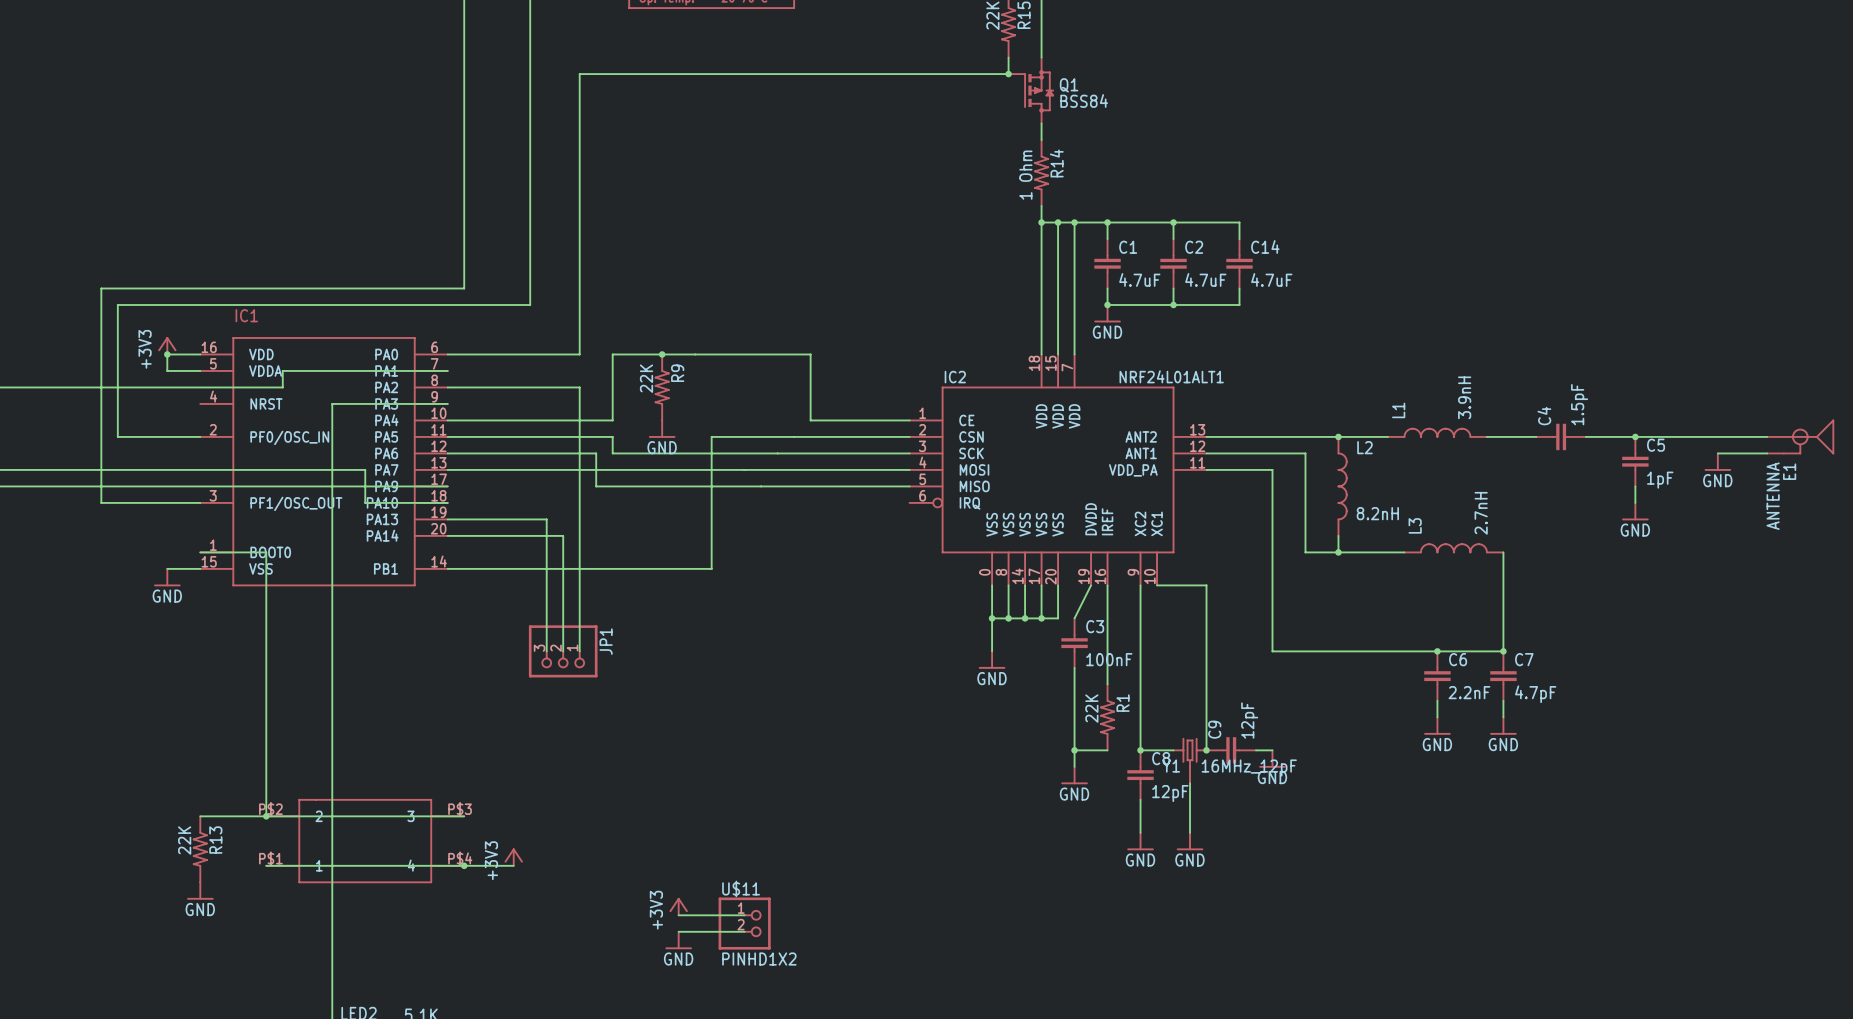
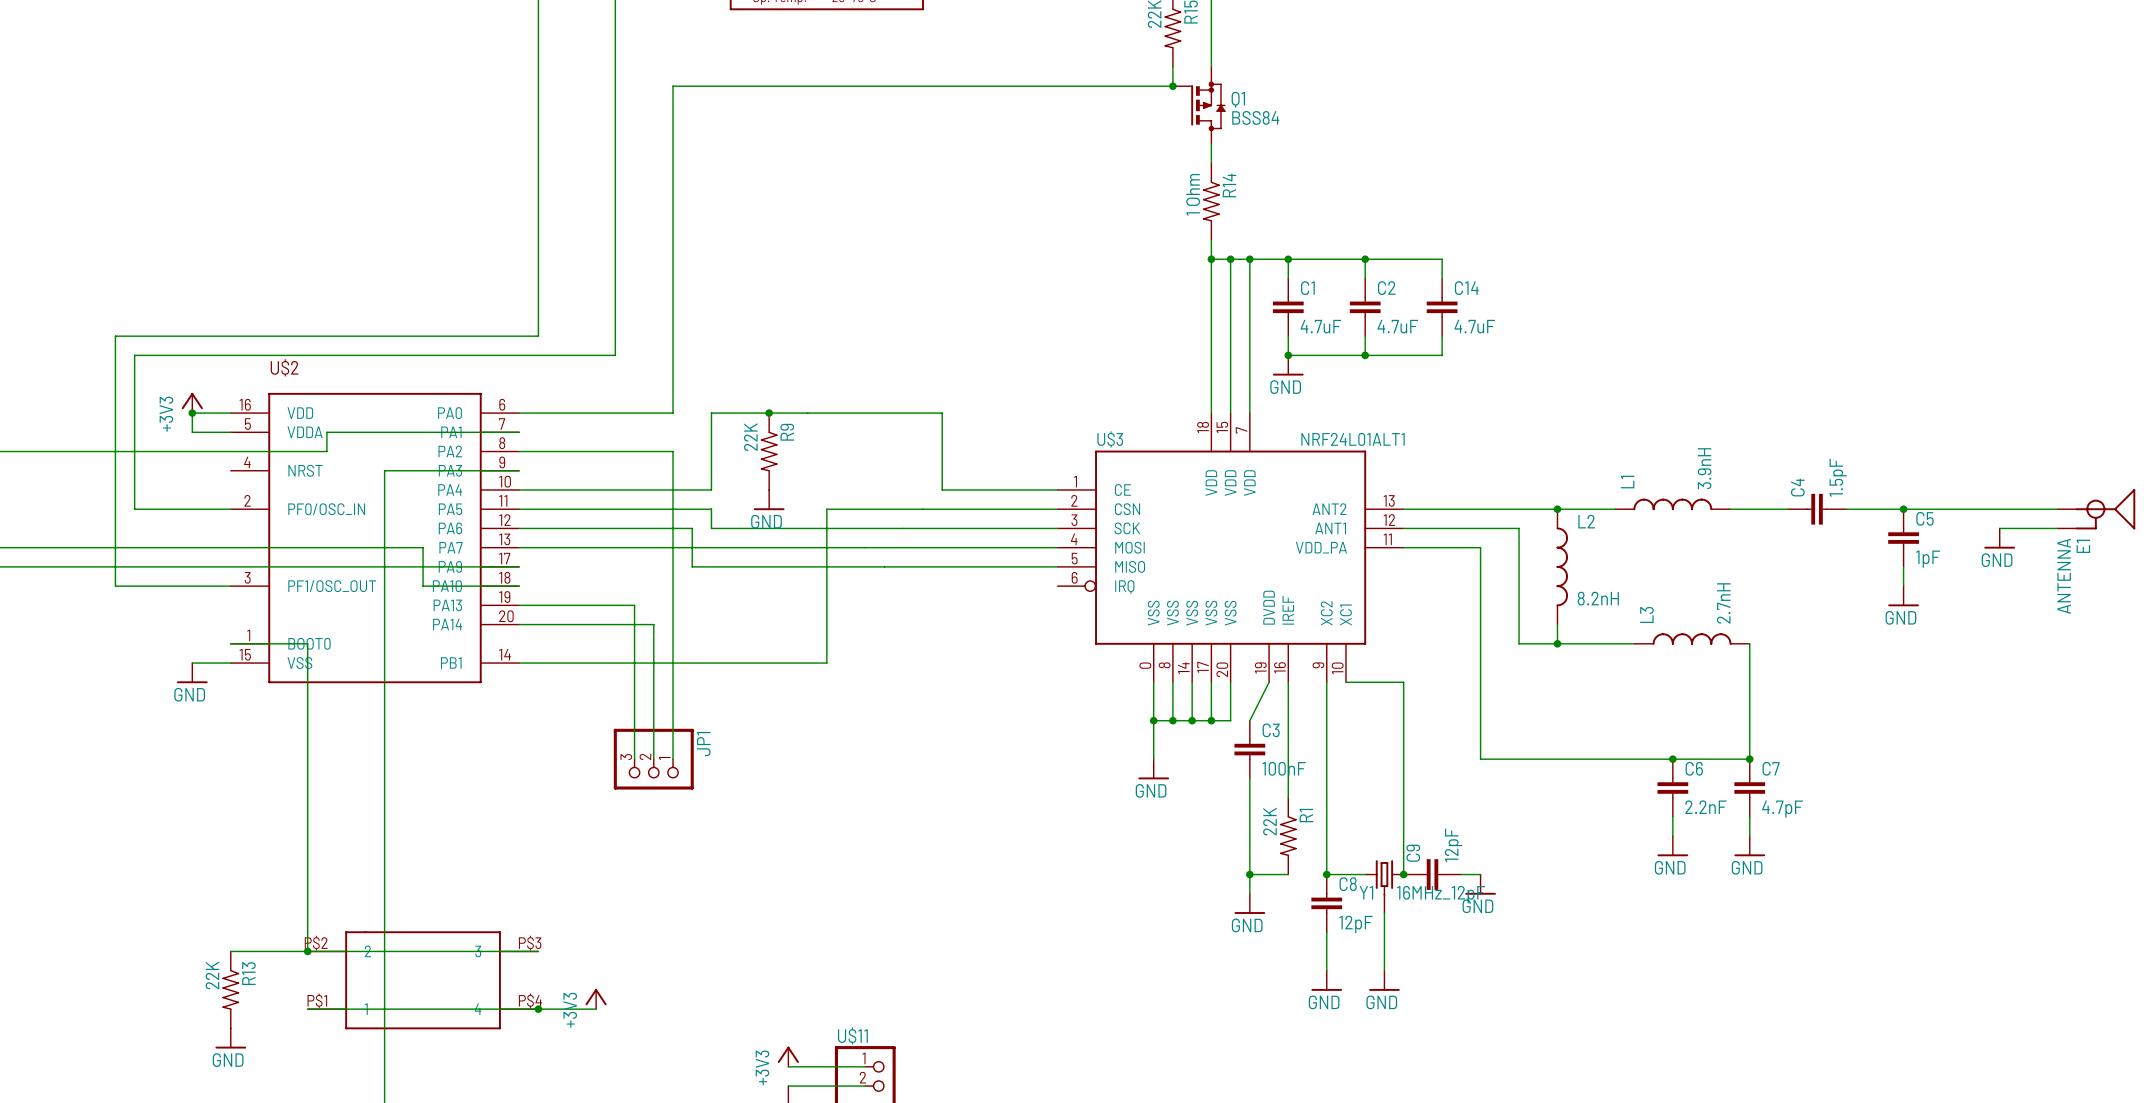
IC1 name: IC1 (246, 315) -> U$2 (284, 367)
IC2 name: IC2 (955, 377) -> U$3 (1110, 439)

